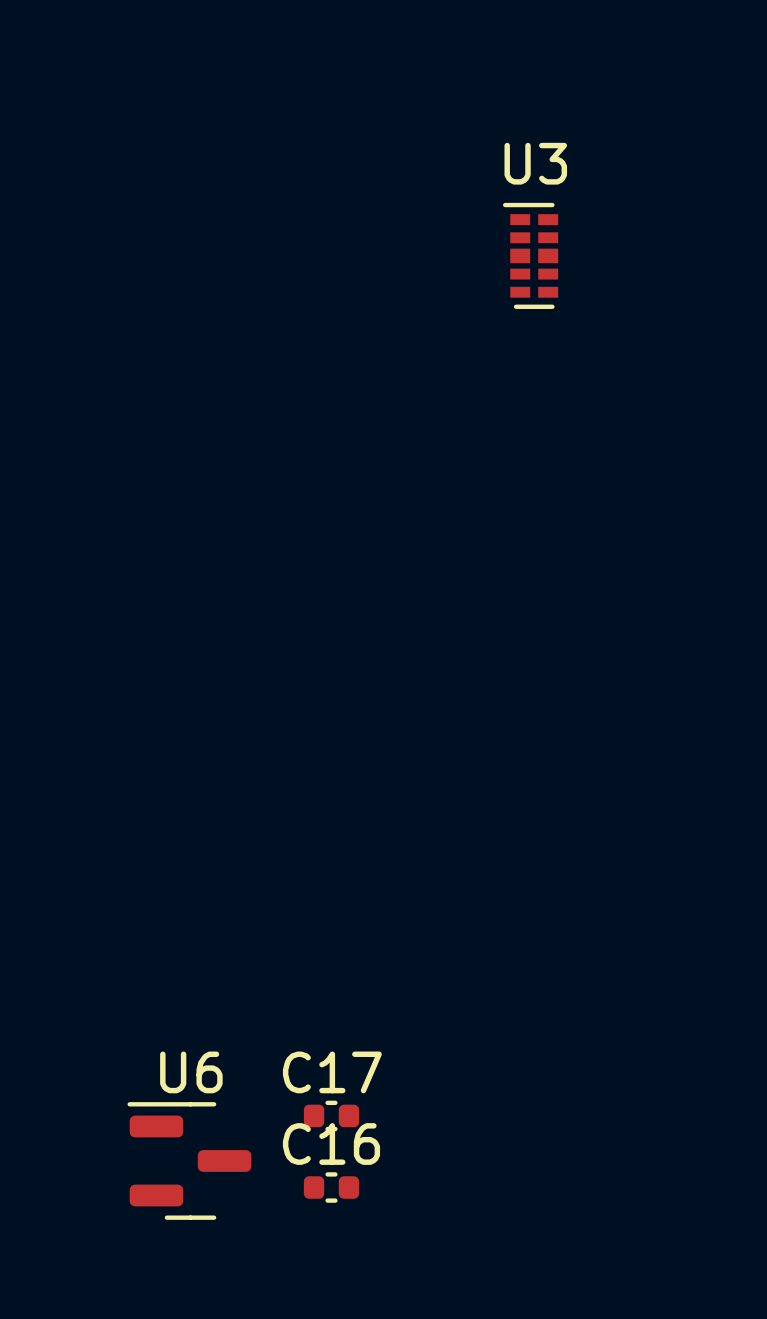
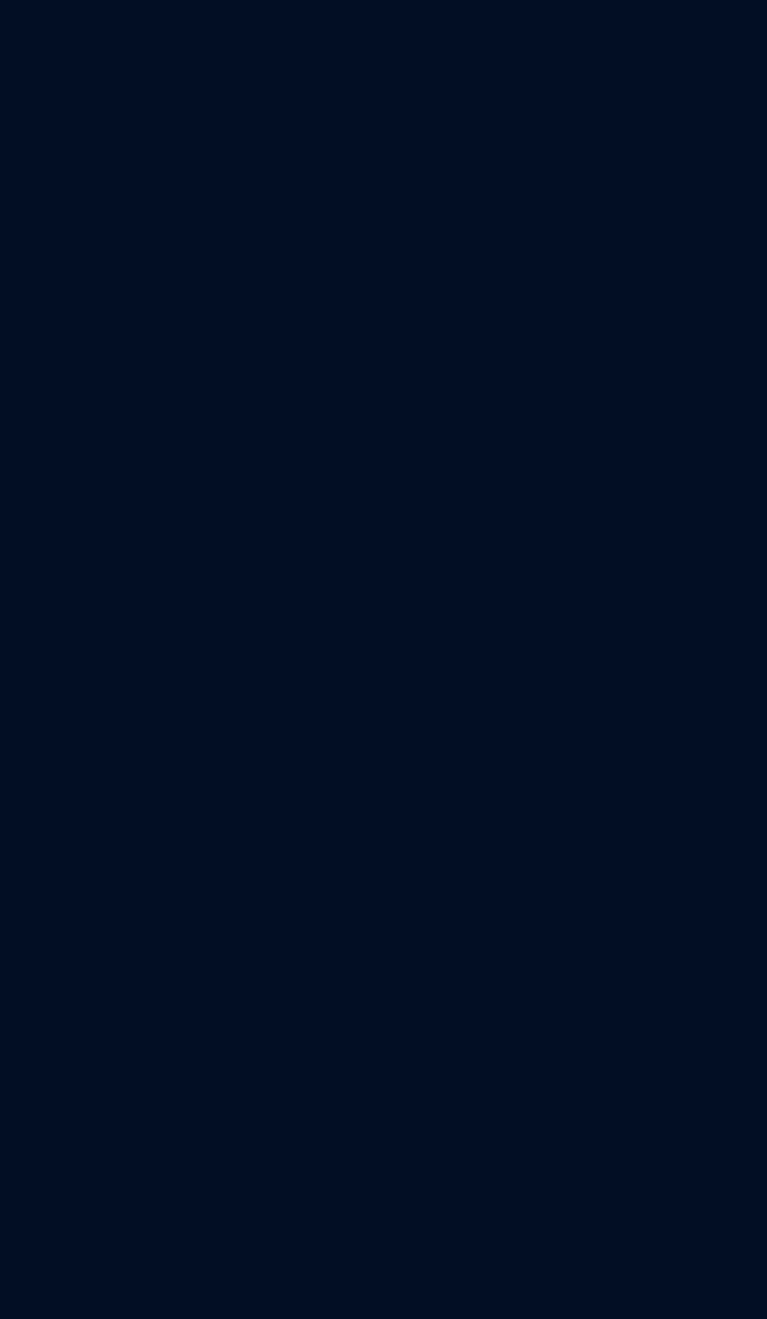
U3: (530, 255) -> none
C17: (331, 1115) -> none
U6: (189, 1160) -> none
C16: (331, 1187) -> none

